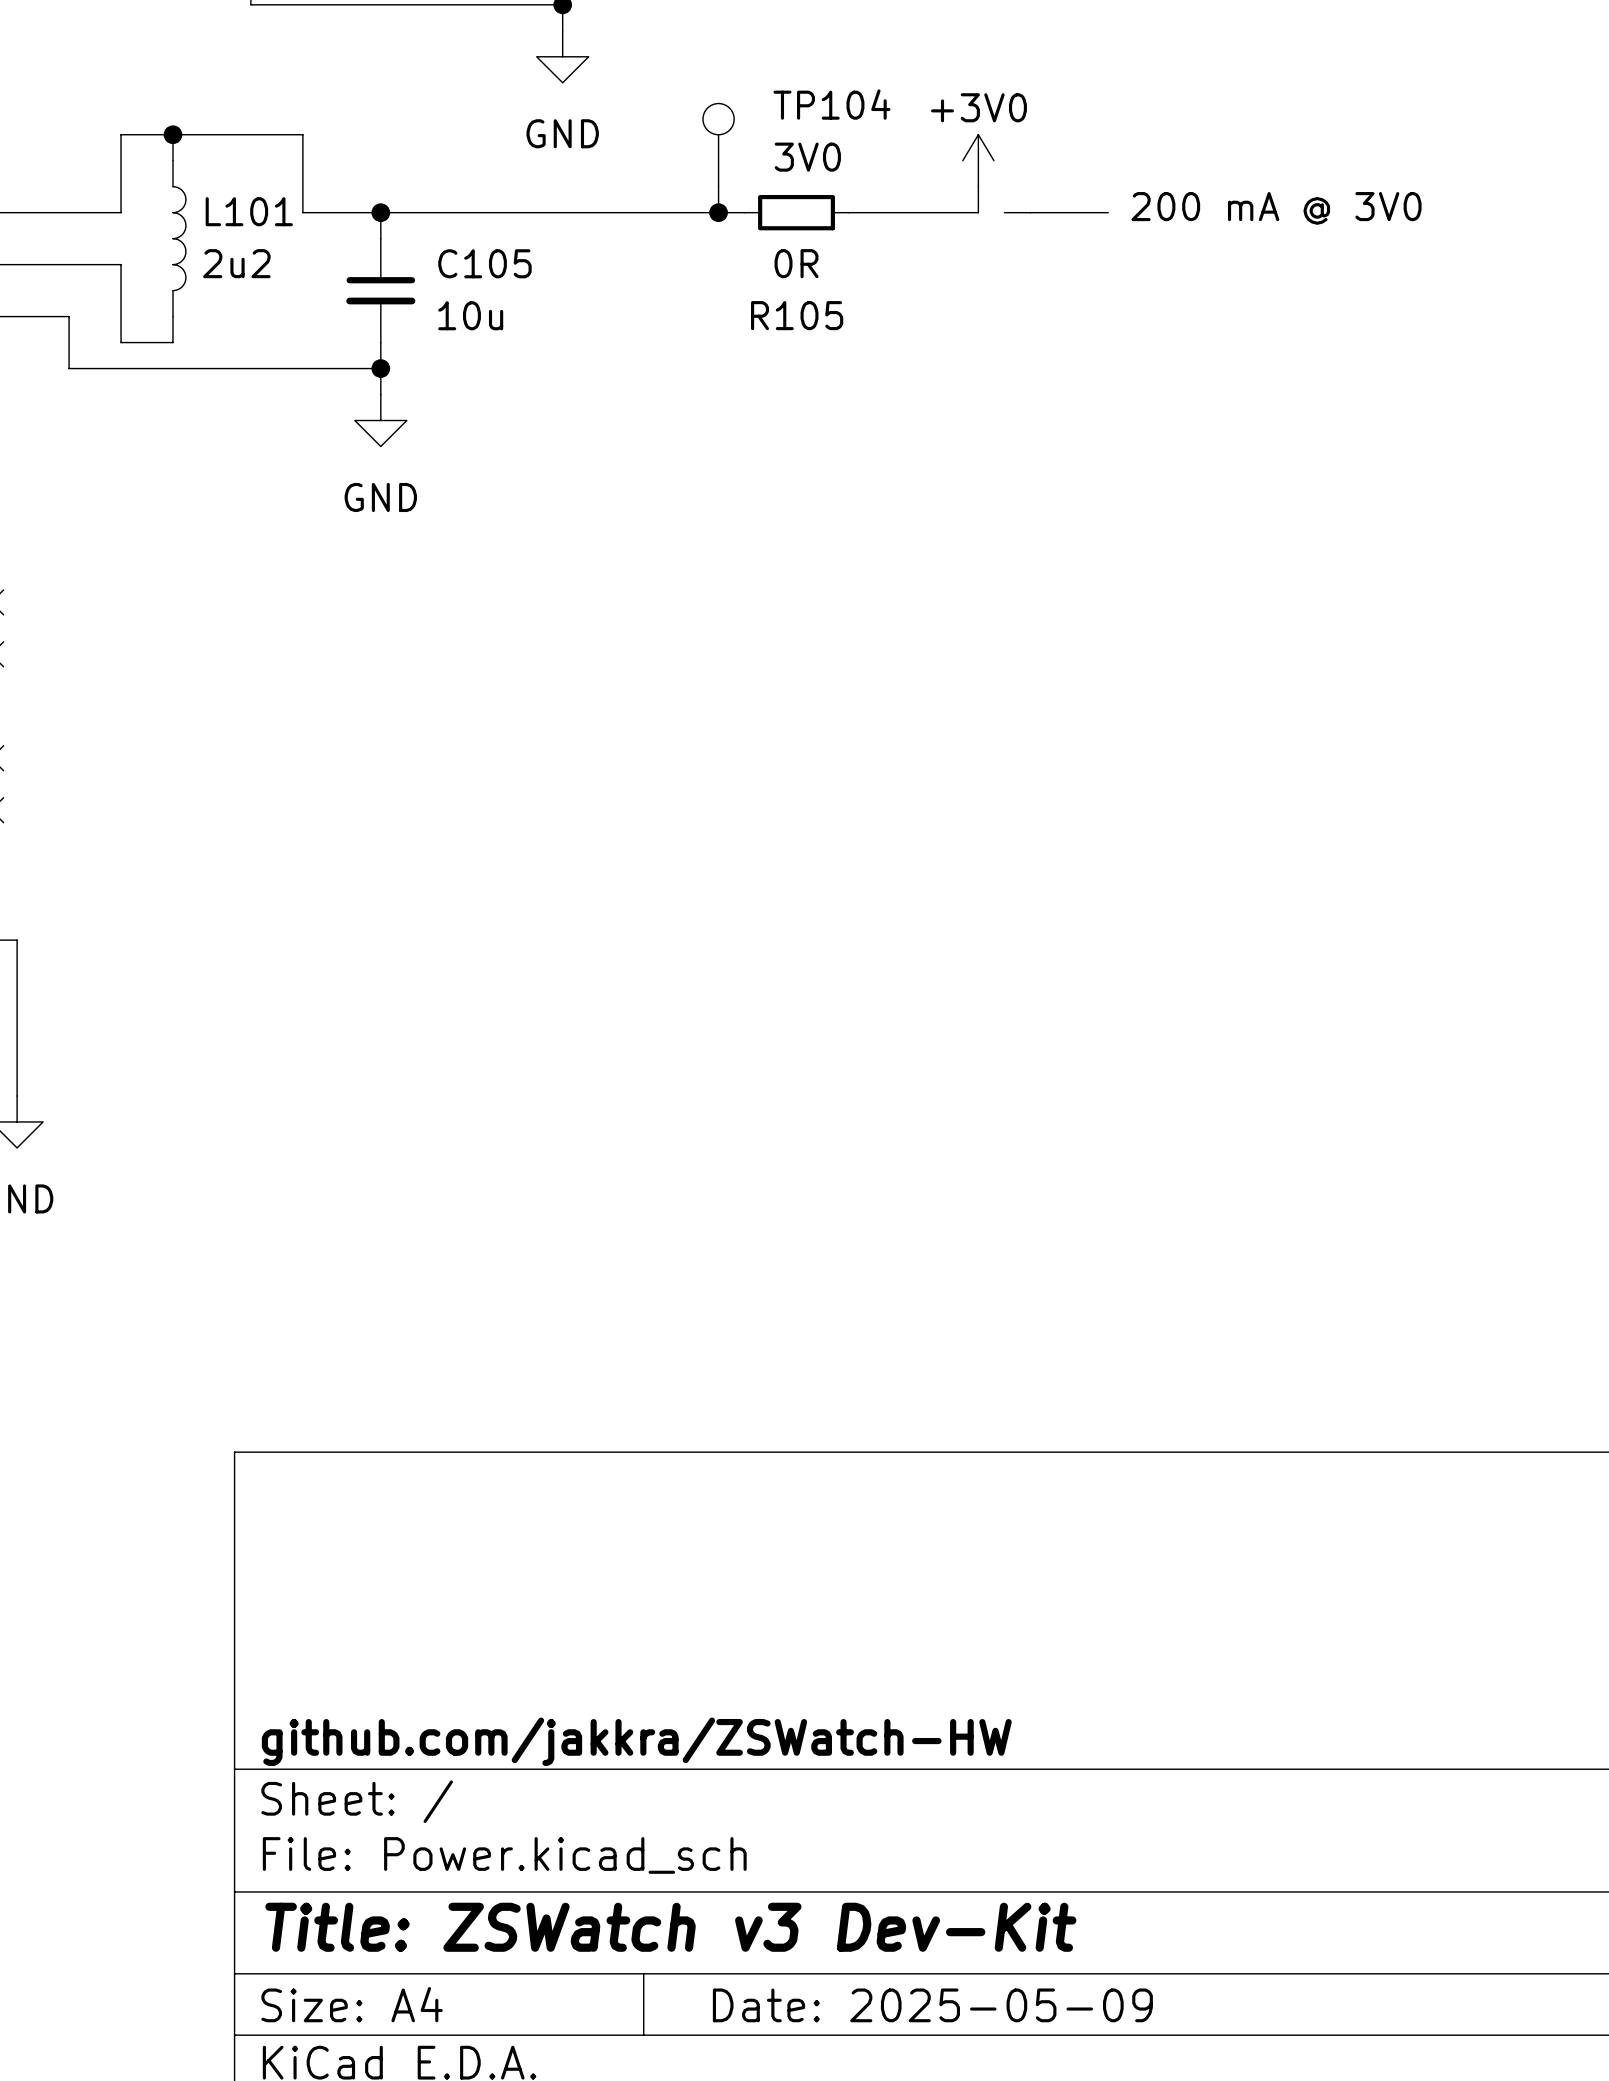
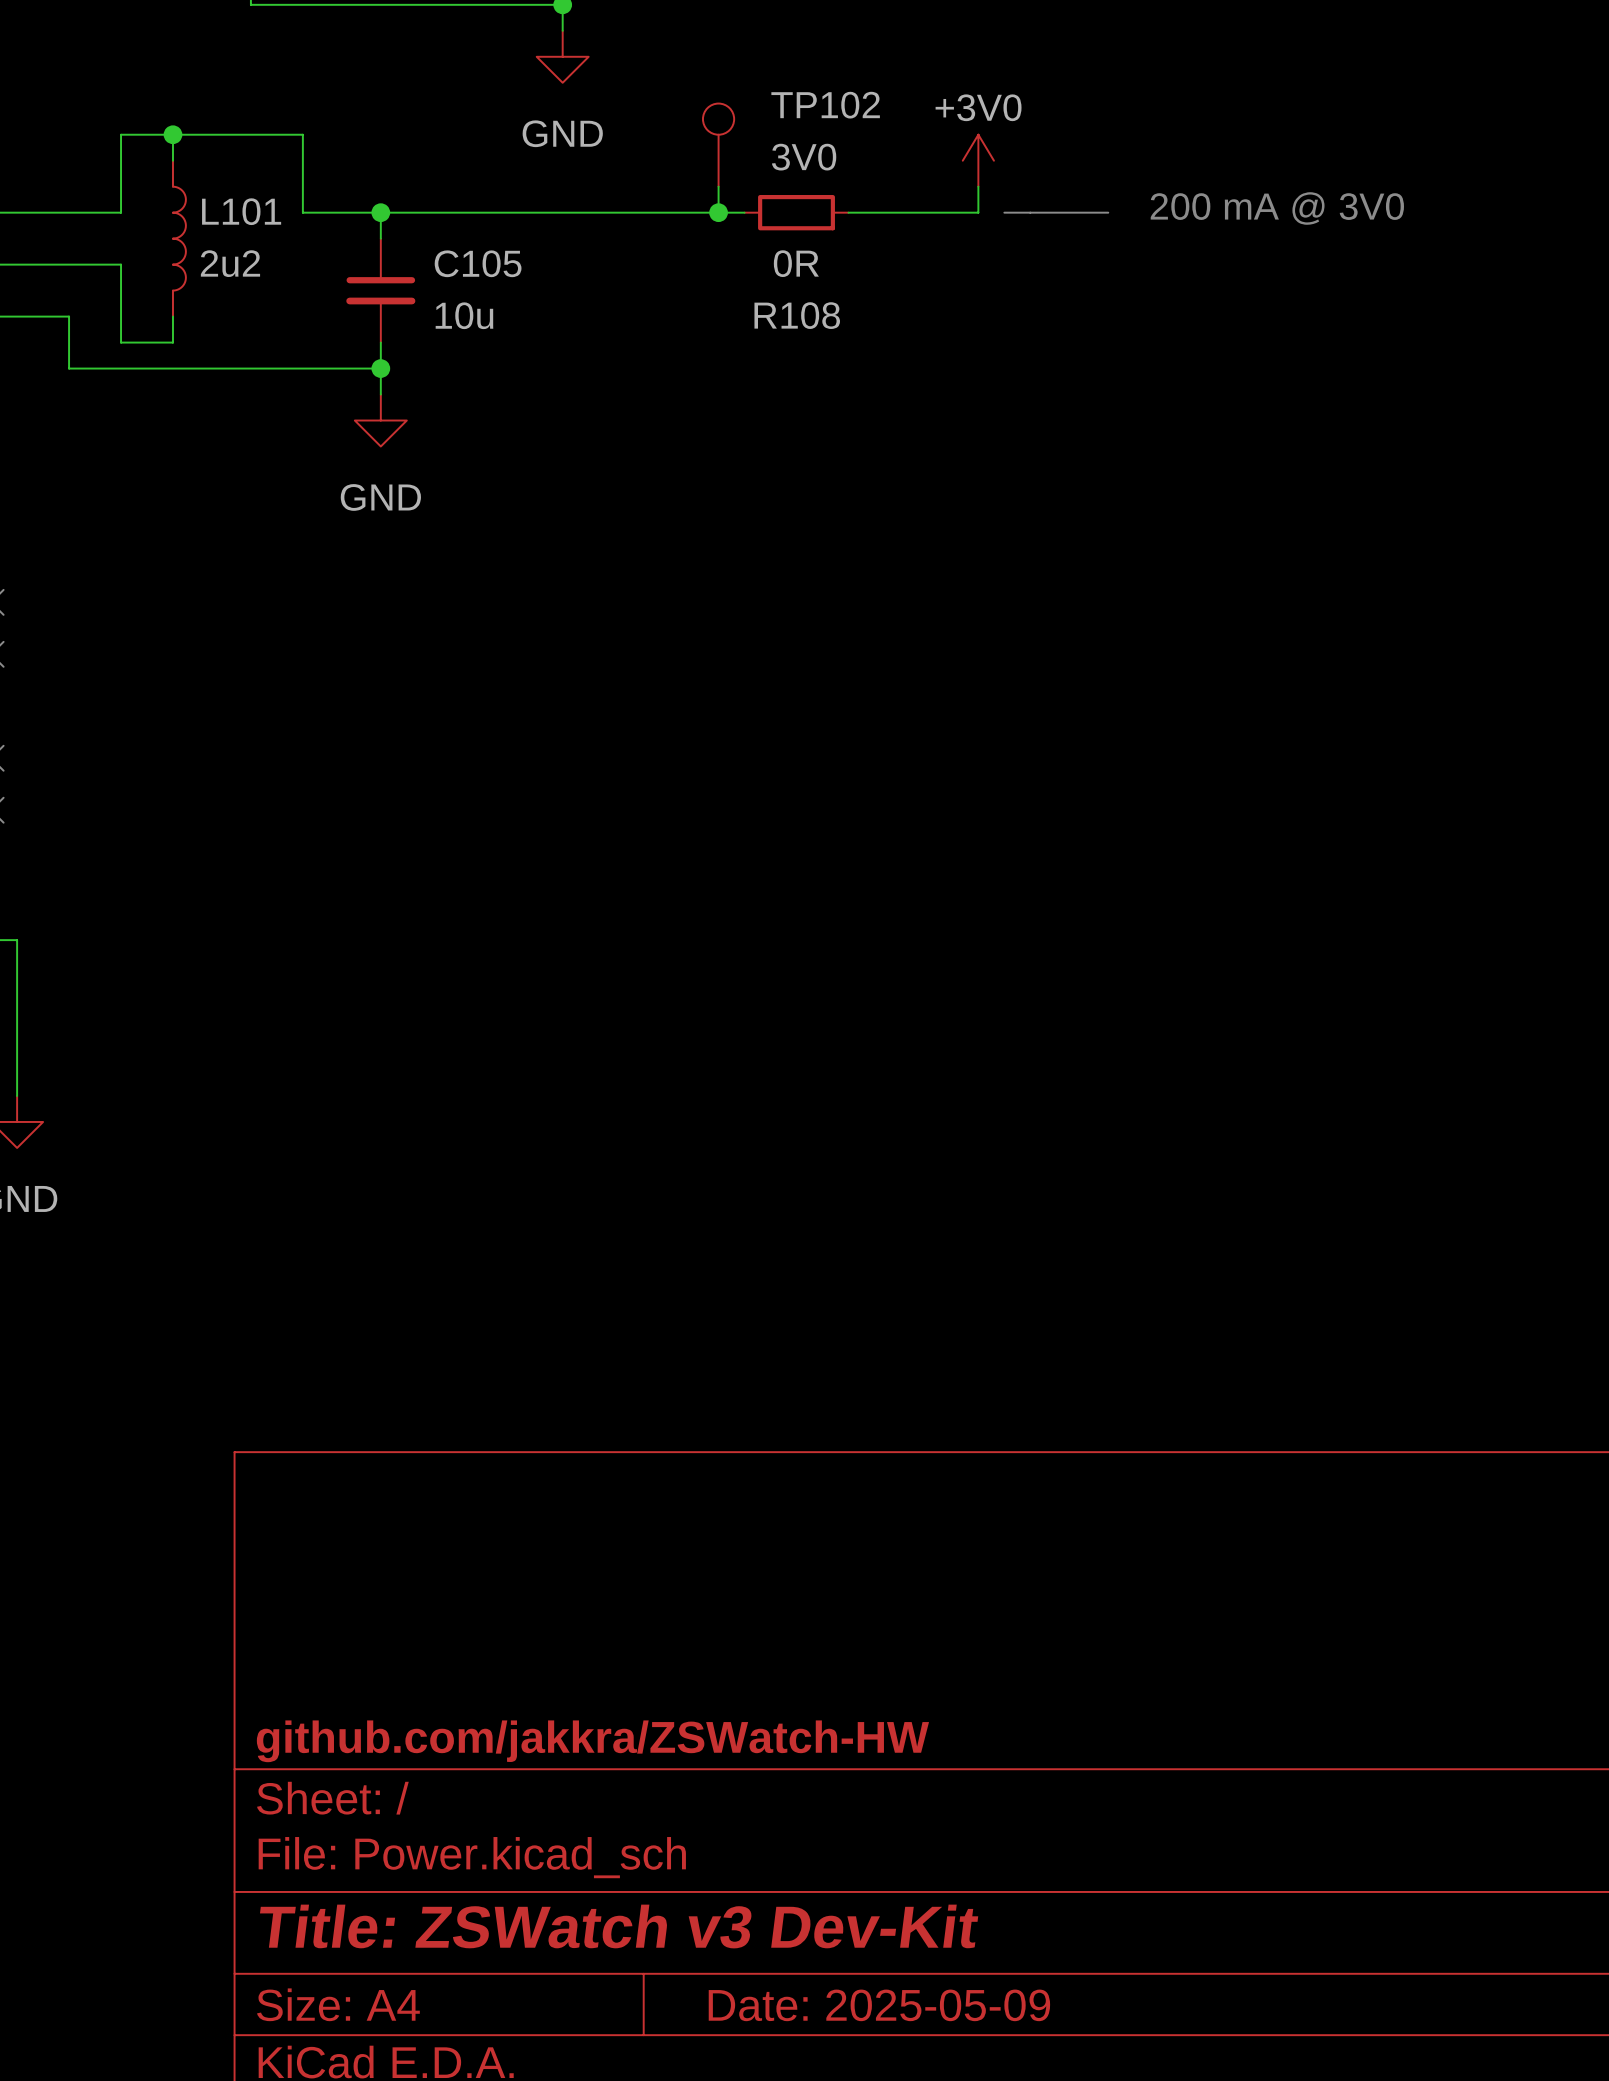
TP104 name: TP104 (831, 104) -> TP102 (825, 105)
R105 name: R105 (797, 315) -> R108 (797, 315)

